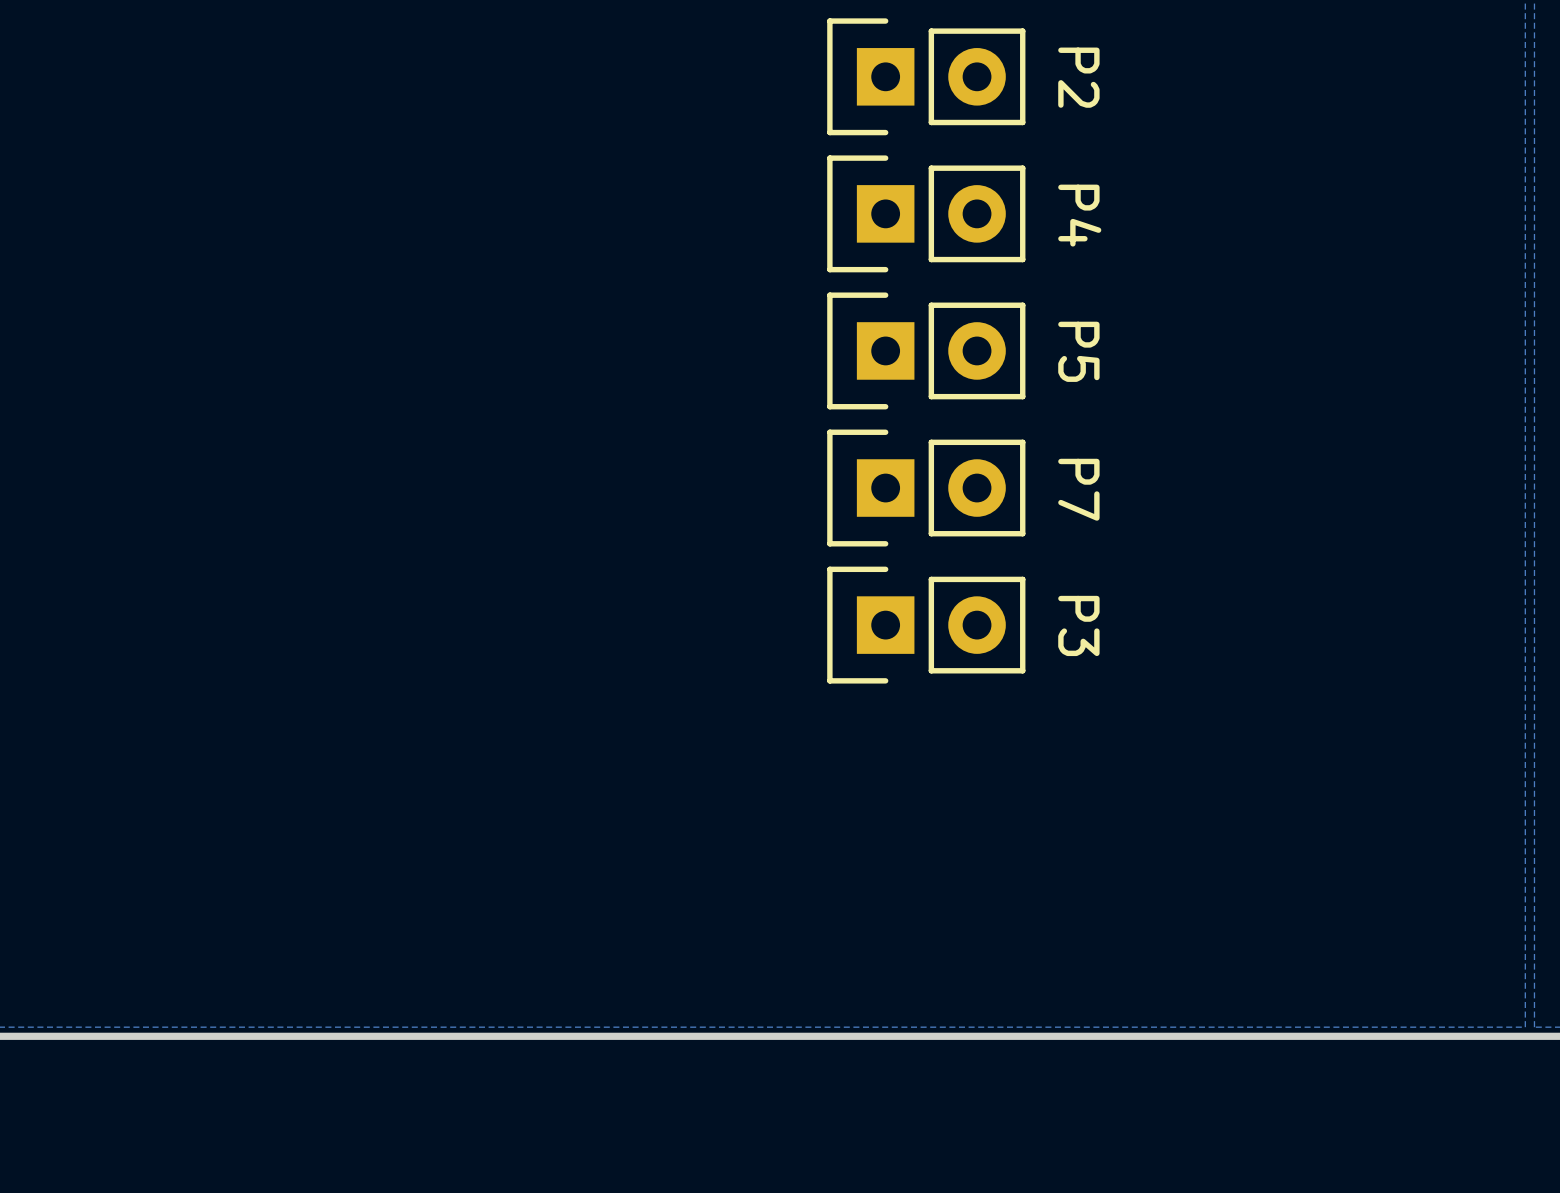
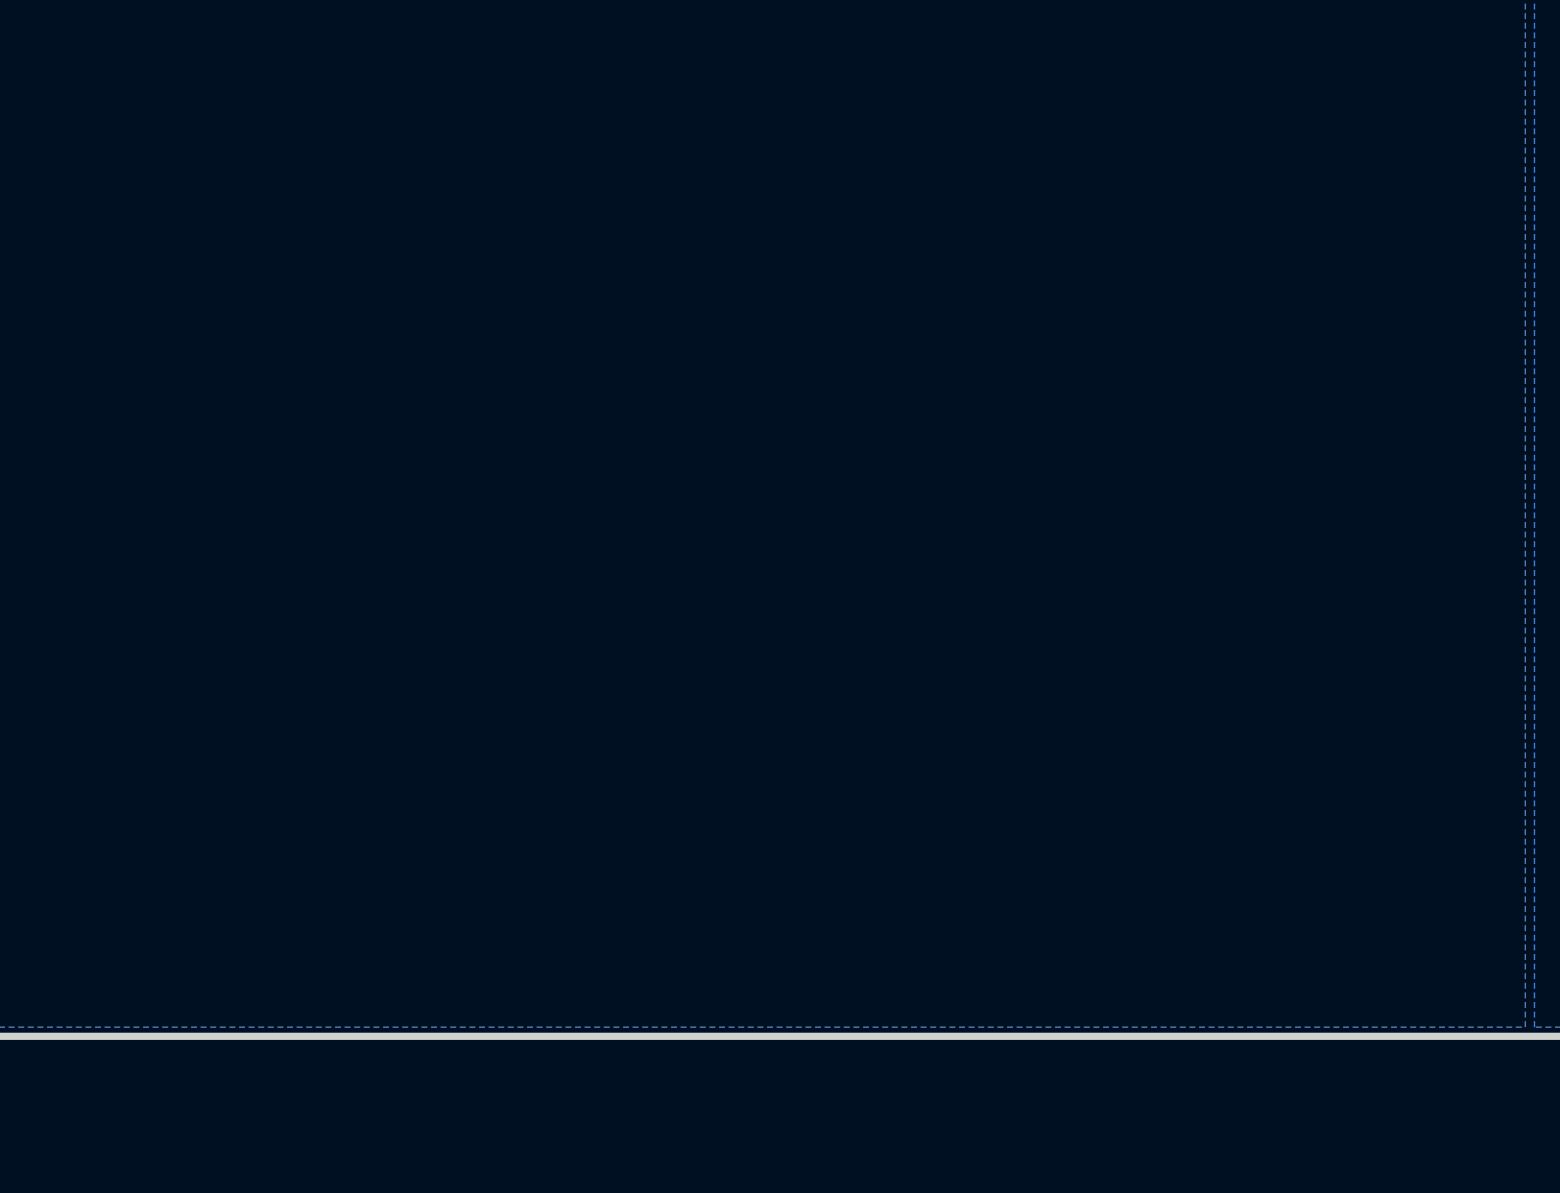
P2: (926, 76) -> none
P4: (926, 213) -> none
P5: (926, 350) -> none
P7: (926, 488) -> none
P3: (926, 625) -> none

